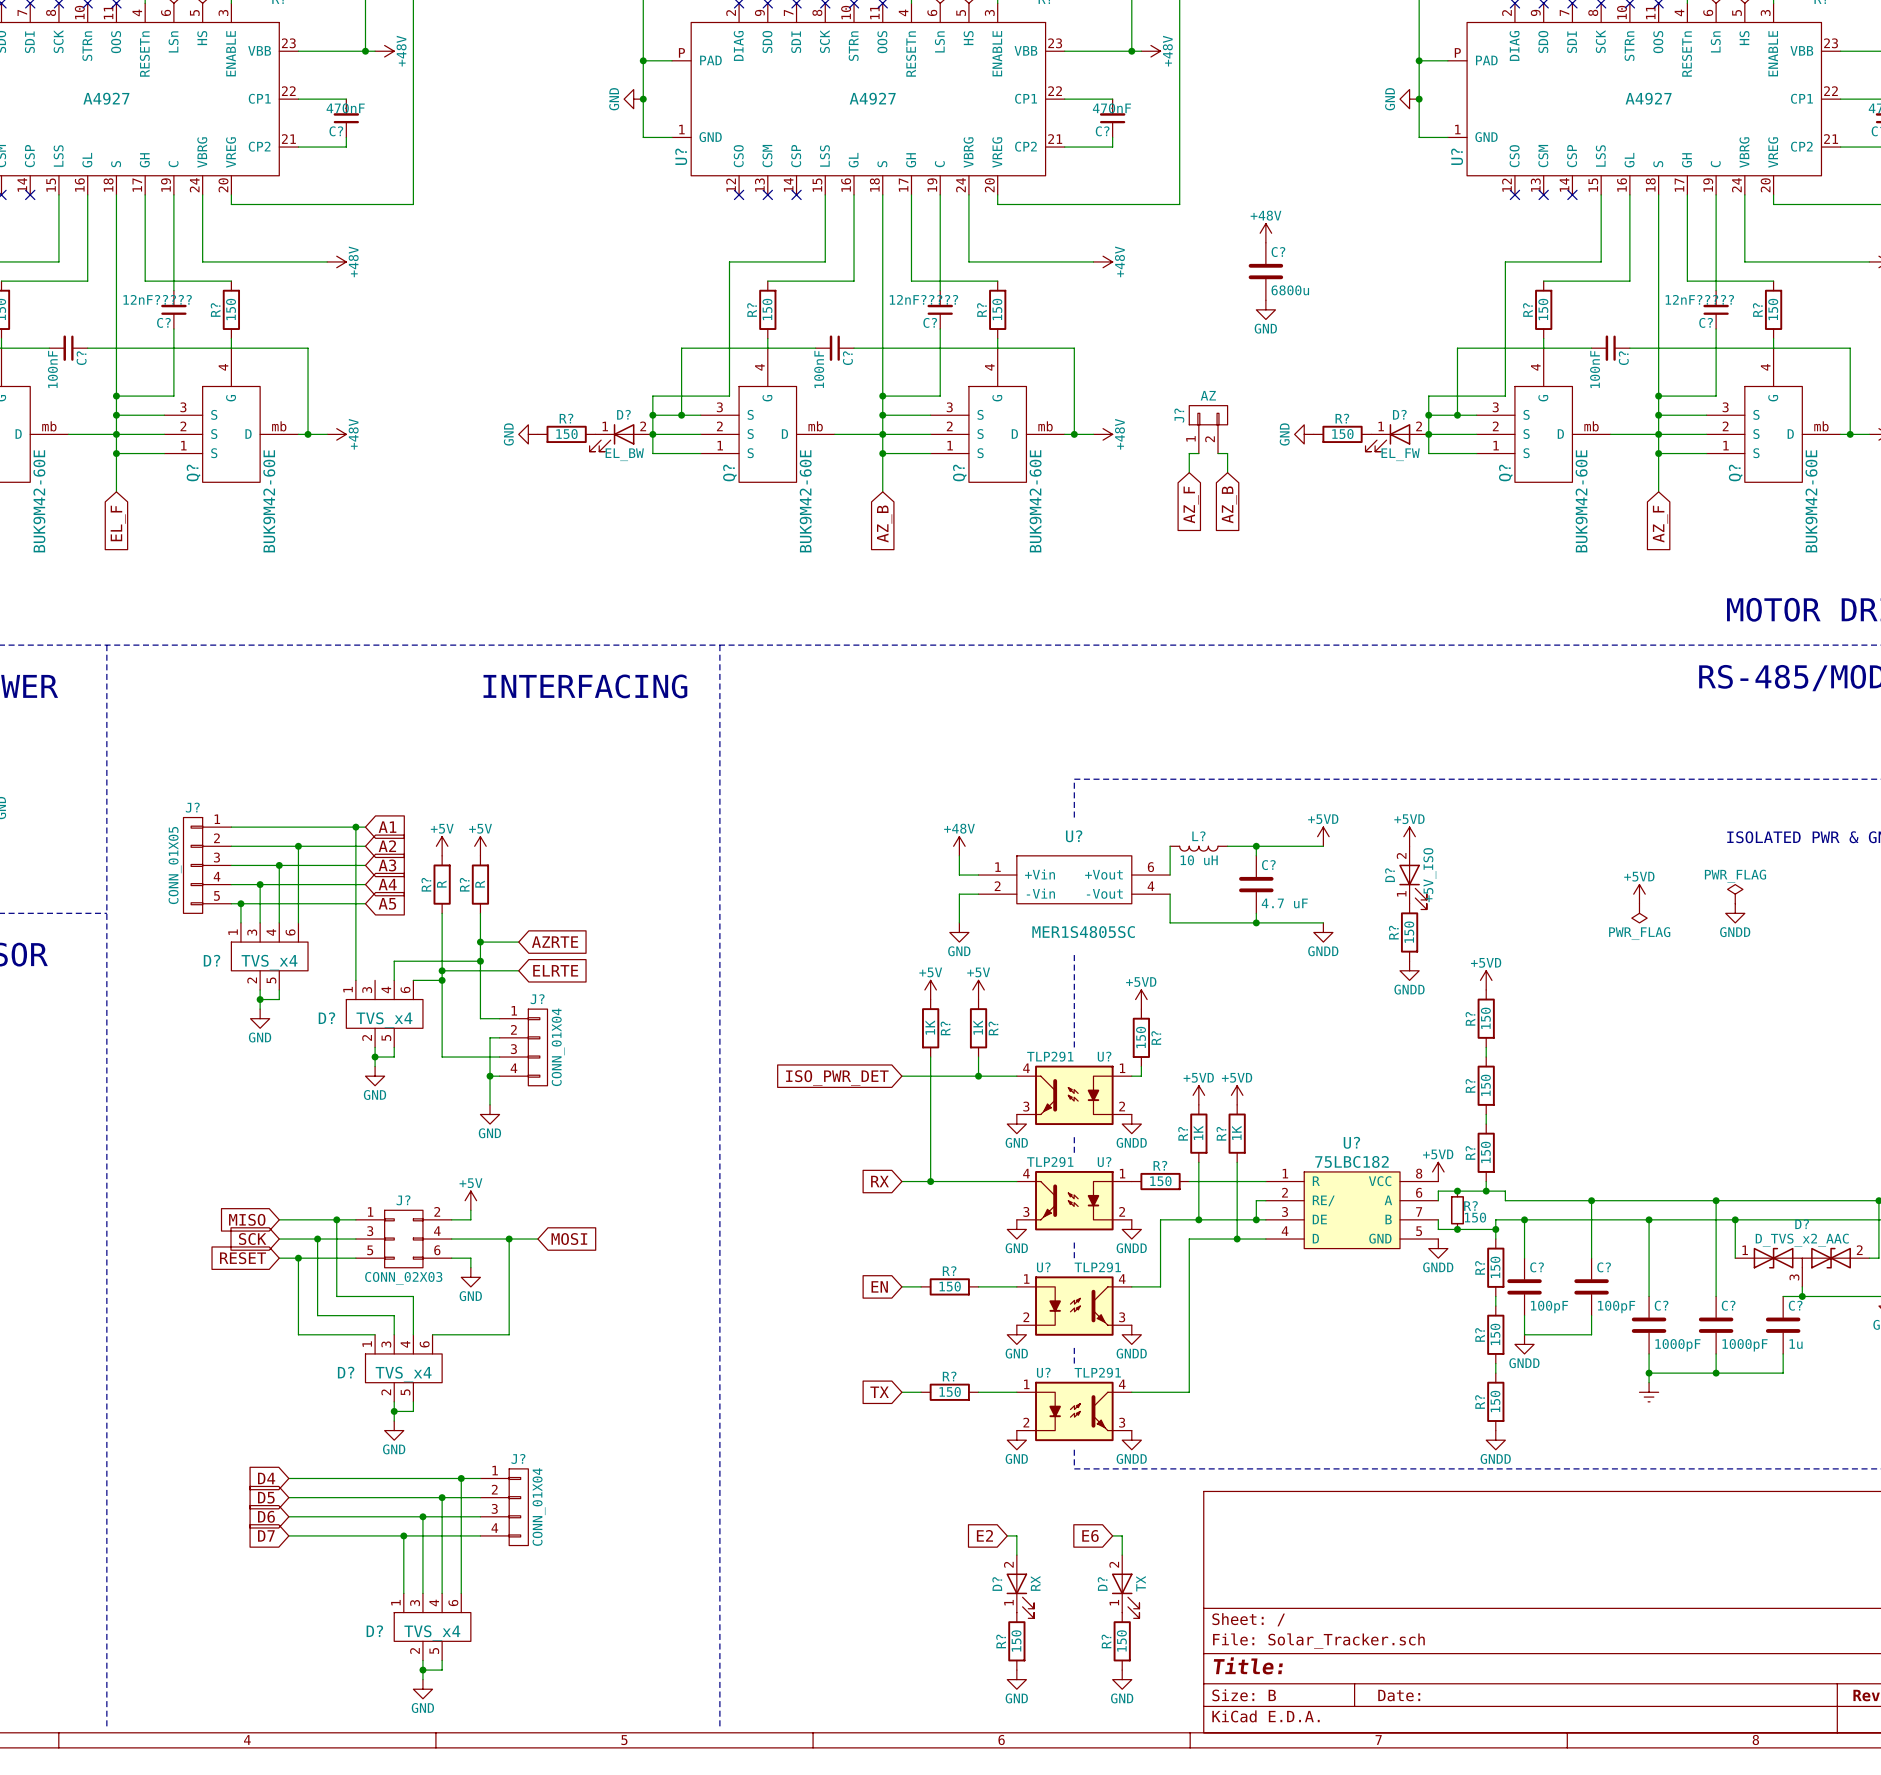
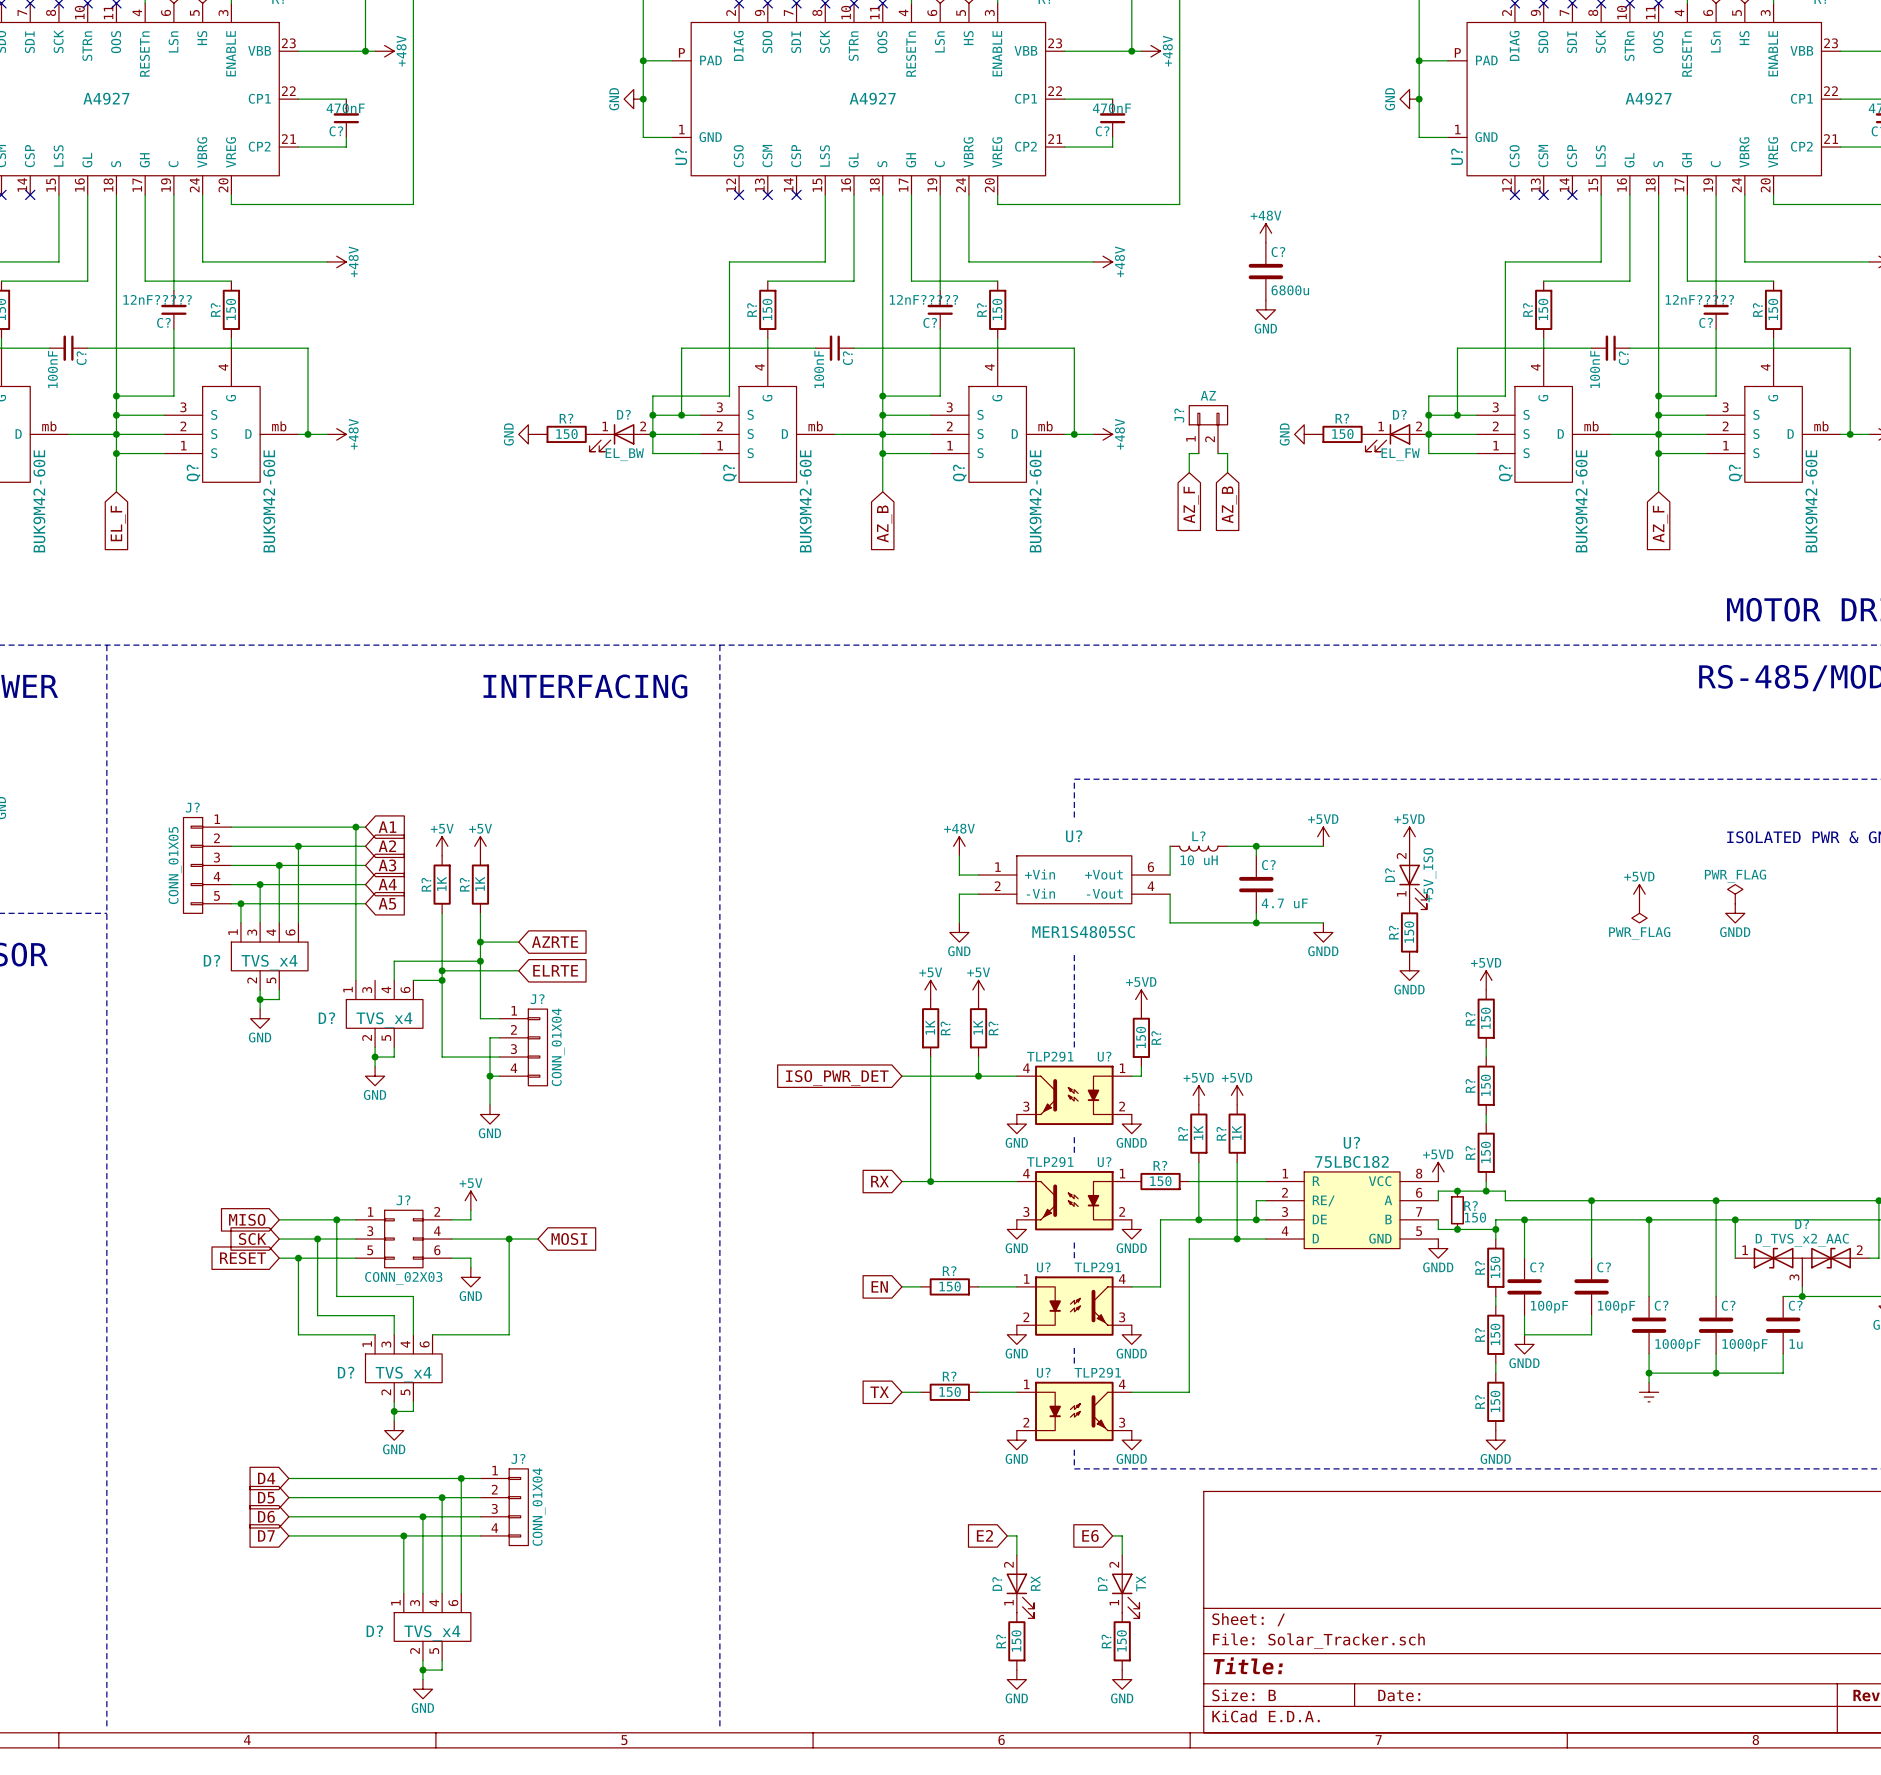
R? value: R (441, 884) -> 1K (441, 883)
R? value: R (480, 884) -> 1K (480, 883)

